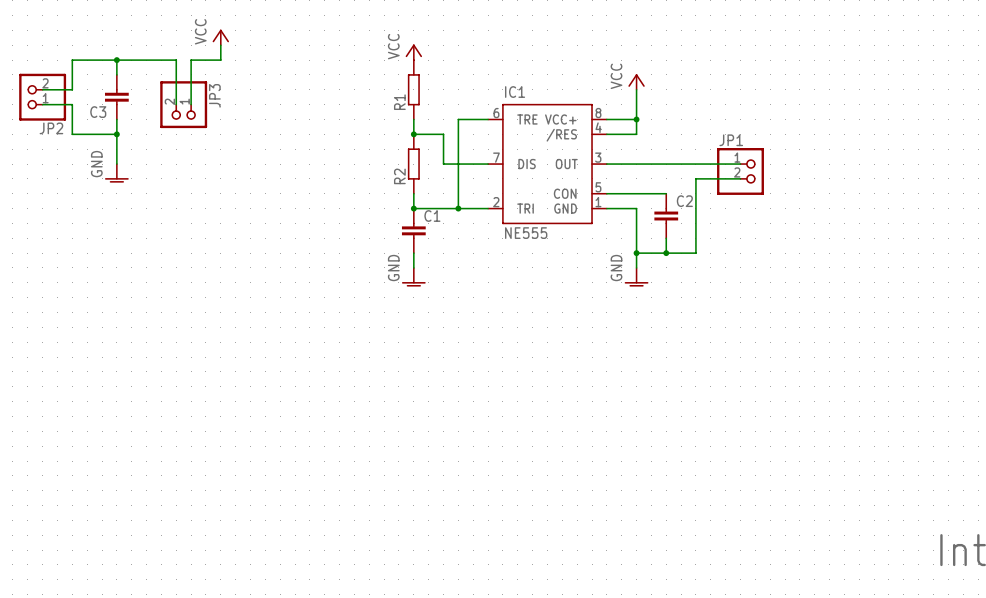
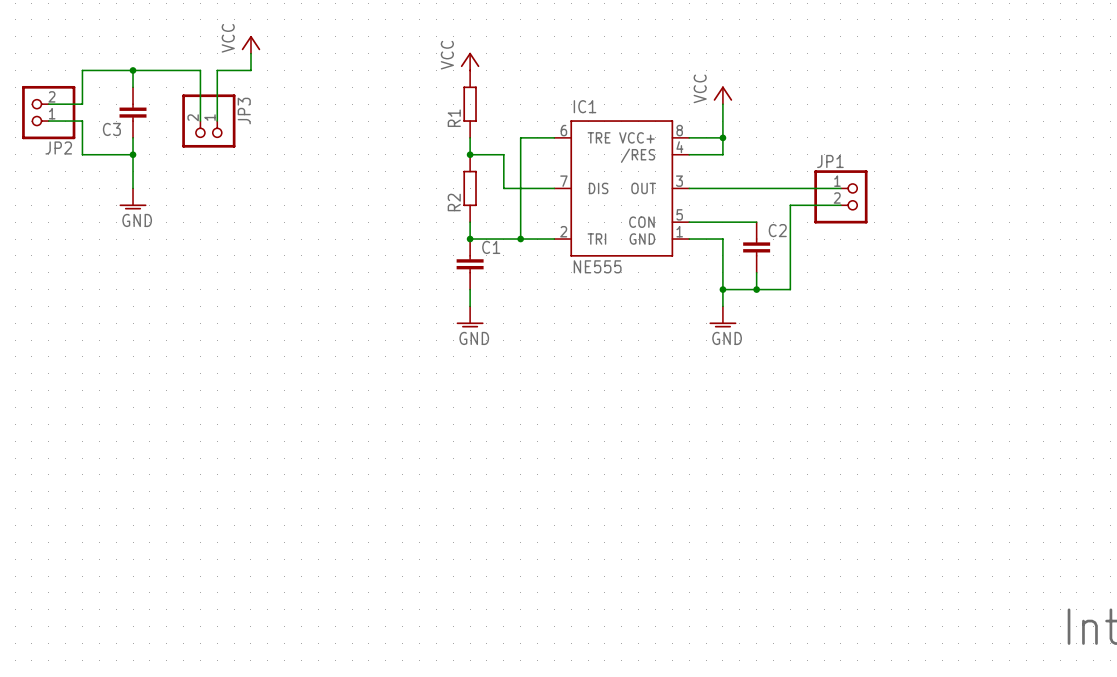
power symbol text rotation: 0° (96, 164) -> 90° clockwise (137, 220)
power symbol text position: GND (96, 164) -> GND (137, 220)
power symbol text rotation: 0° (393, 268) -> 90° clockwise (474, 338)
power symbol text position: GND (393, 268) -> GND (474, 338)
power symbol text rotation: 0° (616, 268) -> 90° clockwise (727, 338)
power symbol text position: GND (616, 268) -> GND (727, 338)

